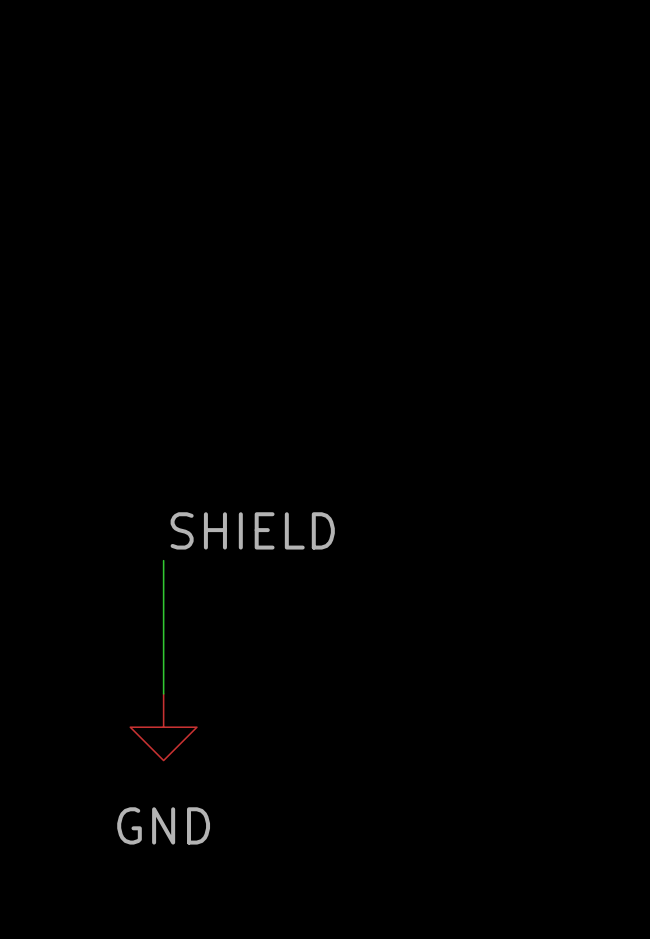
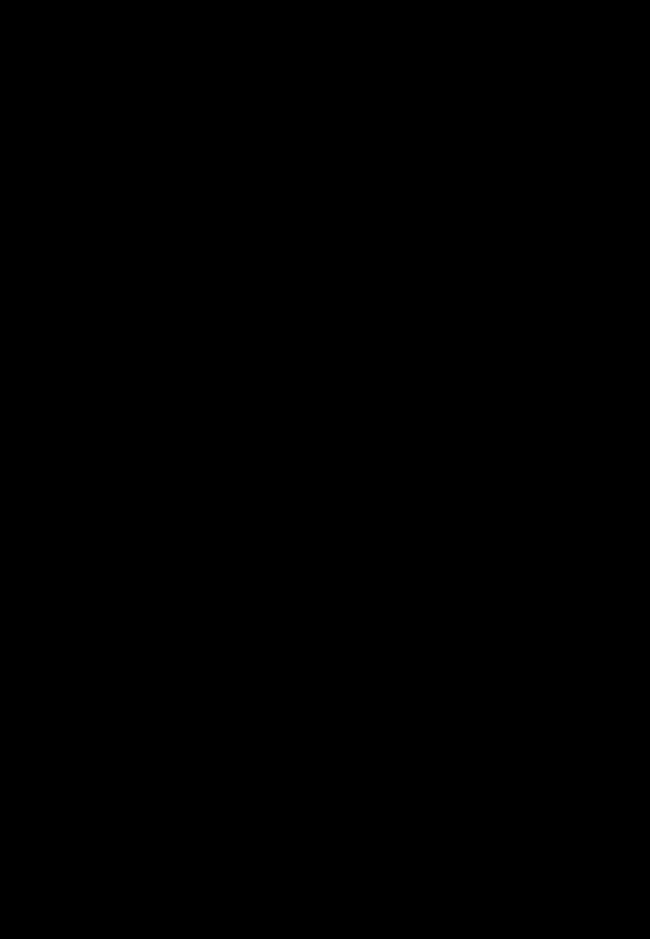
label: SHIELD (252, 530) -> none
wire: (163, 560) (163, 693) -> none
power symbol: GND (163, 727) -> none

